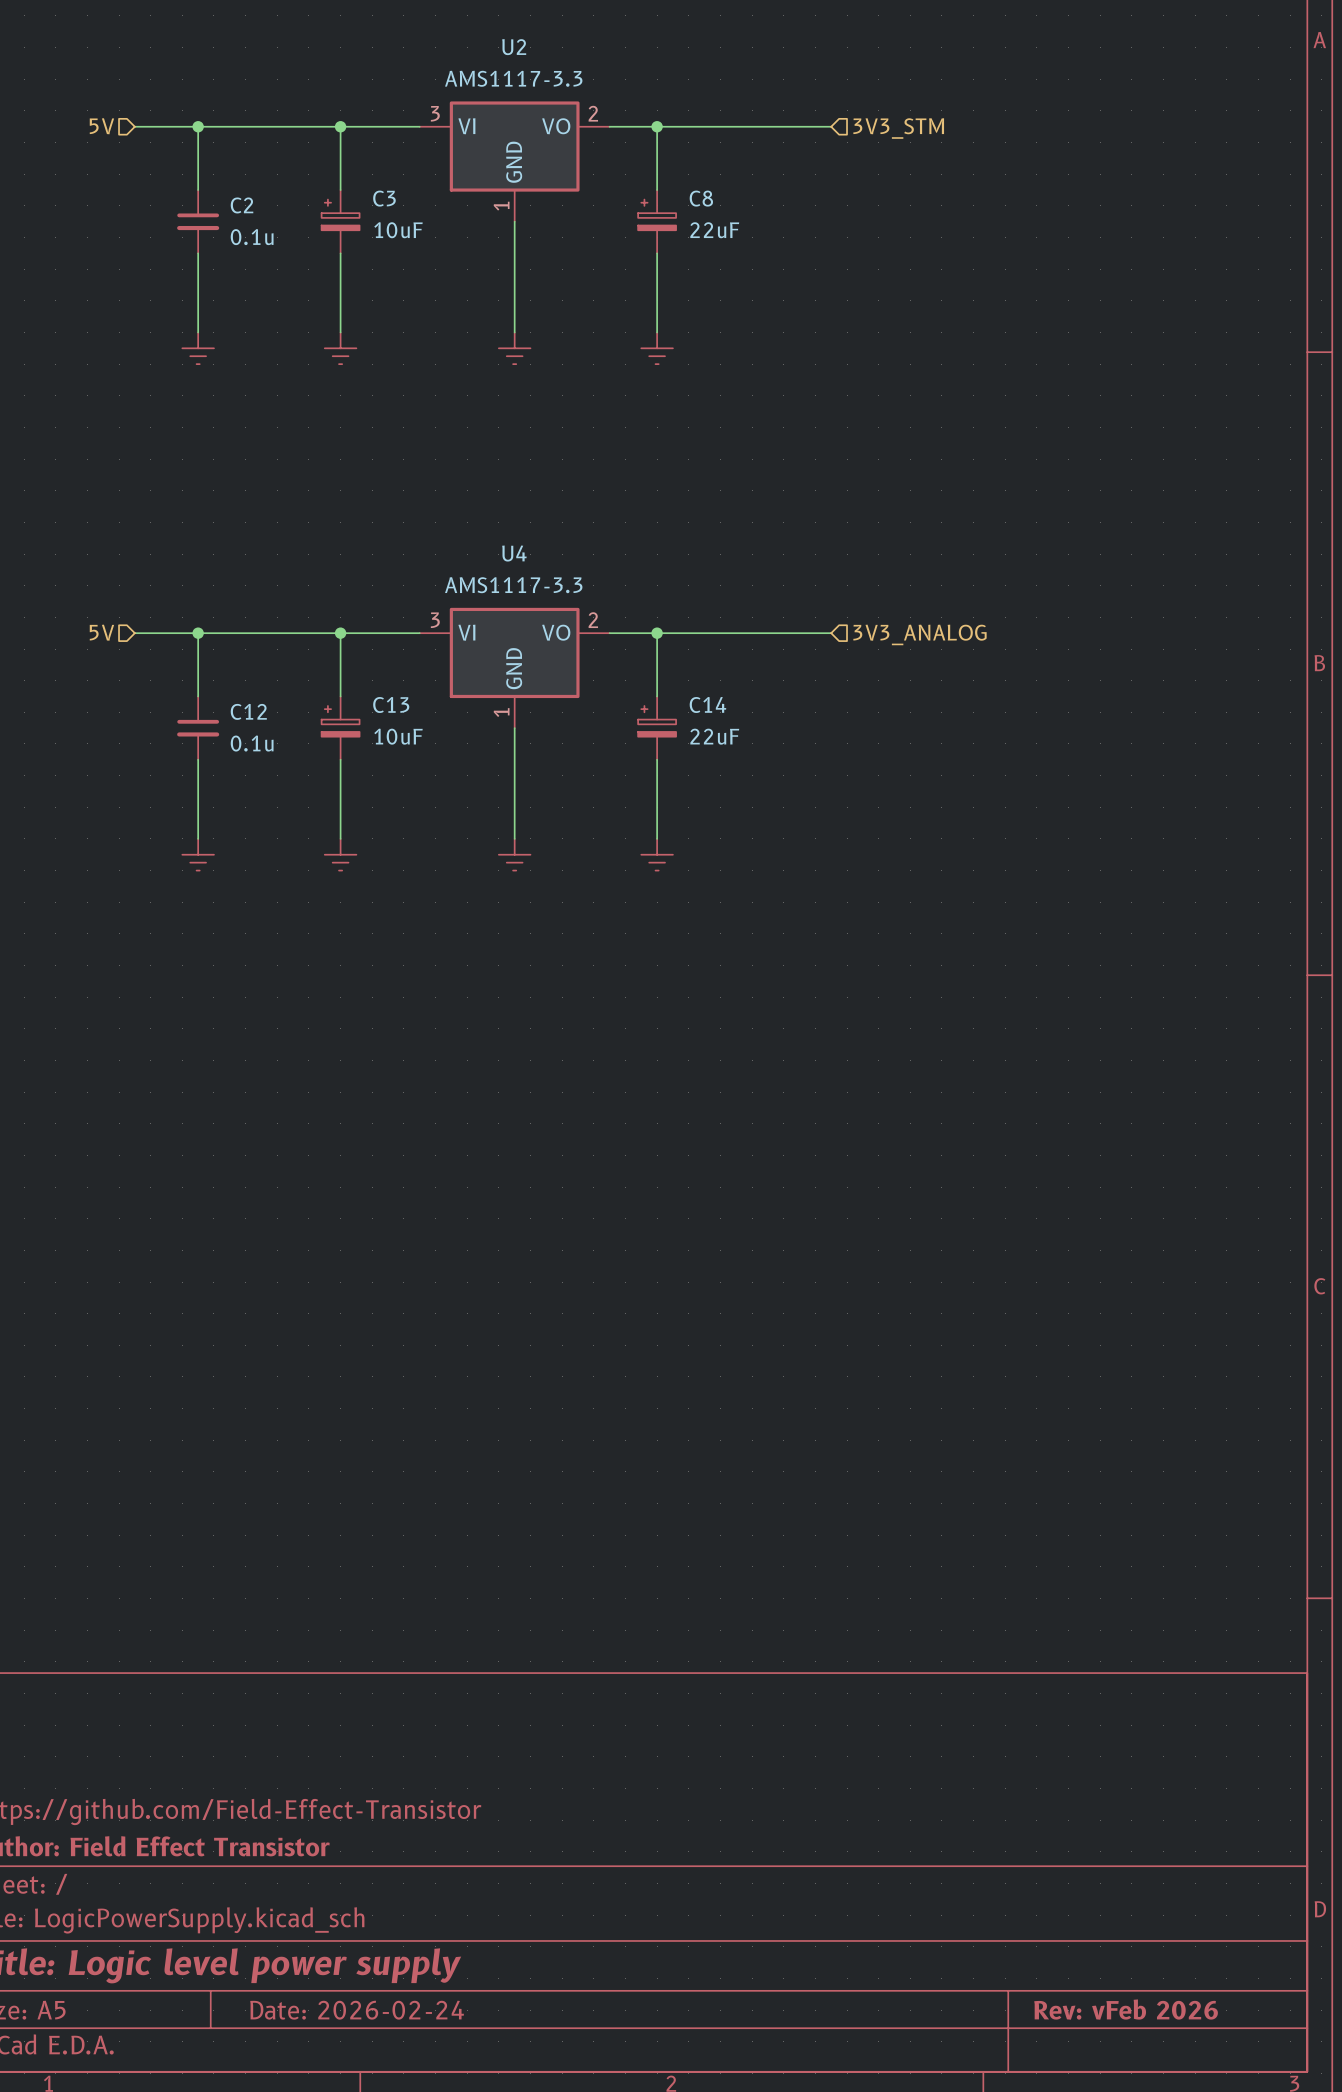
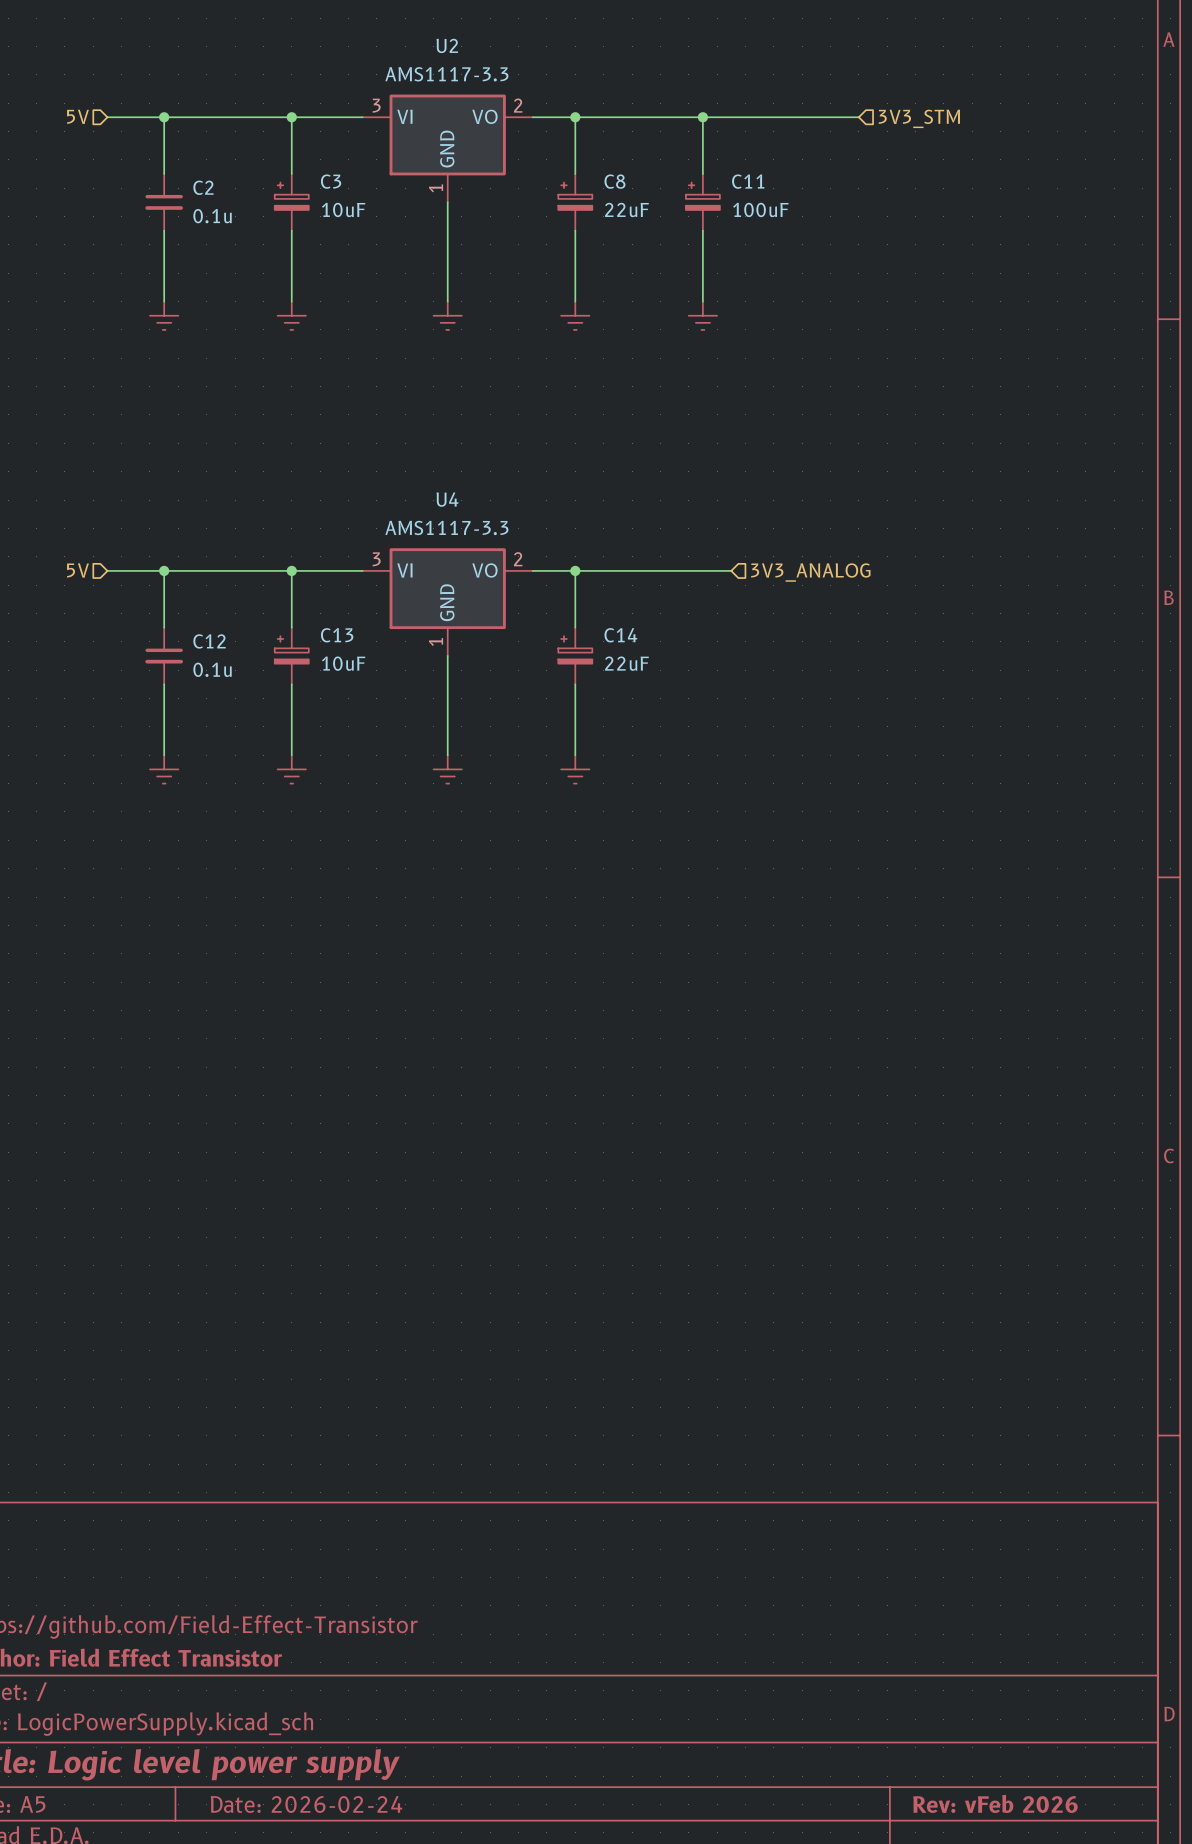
wire: none -> (702, 117) (702, 173)
junction: none -> (702, 117)
wire: none -> (731, 117) (858, 117)
hierarchical label position: 3V3_STM (898, 128) -> 3V3_STM (919, 118)
C11: none -> 100uF (702, 202)
wire: none -> (702, 230) (702, 301)
power symbol: none -> (702, 315)

